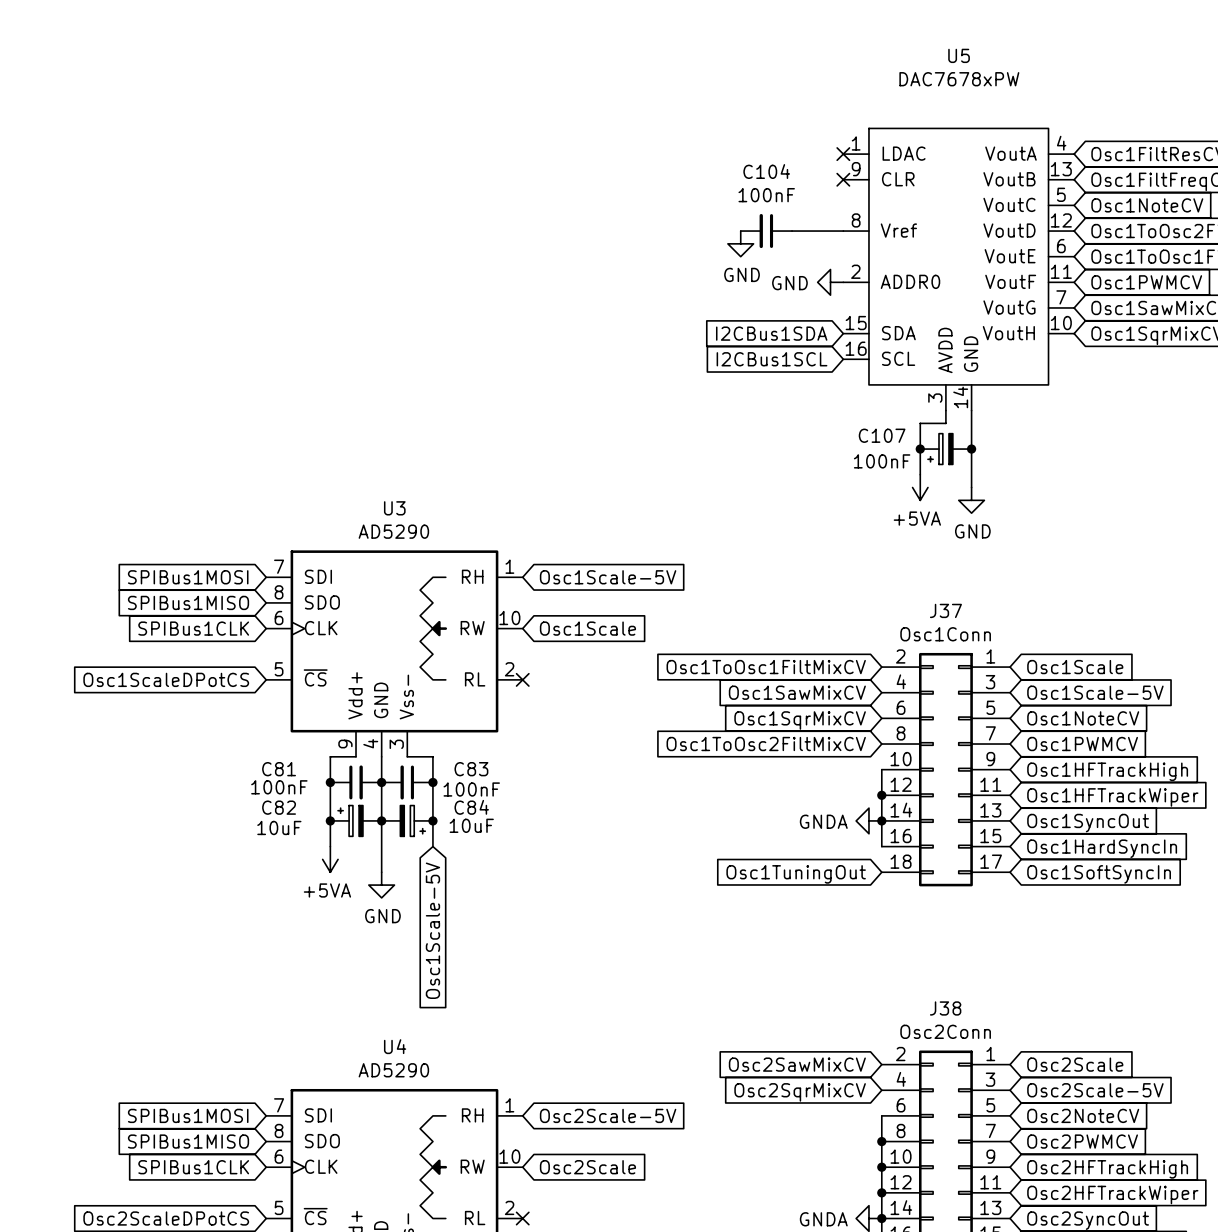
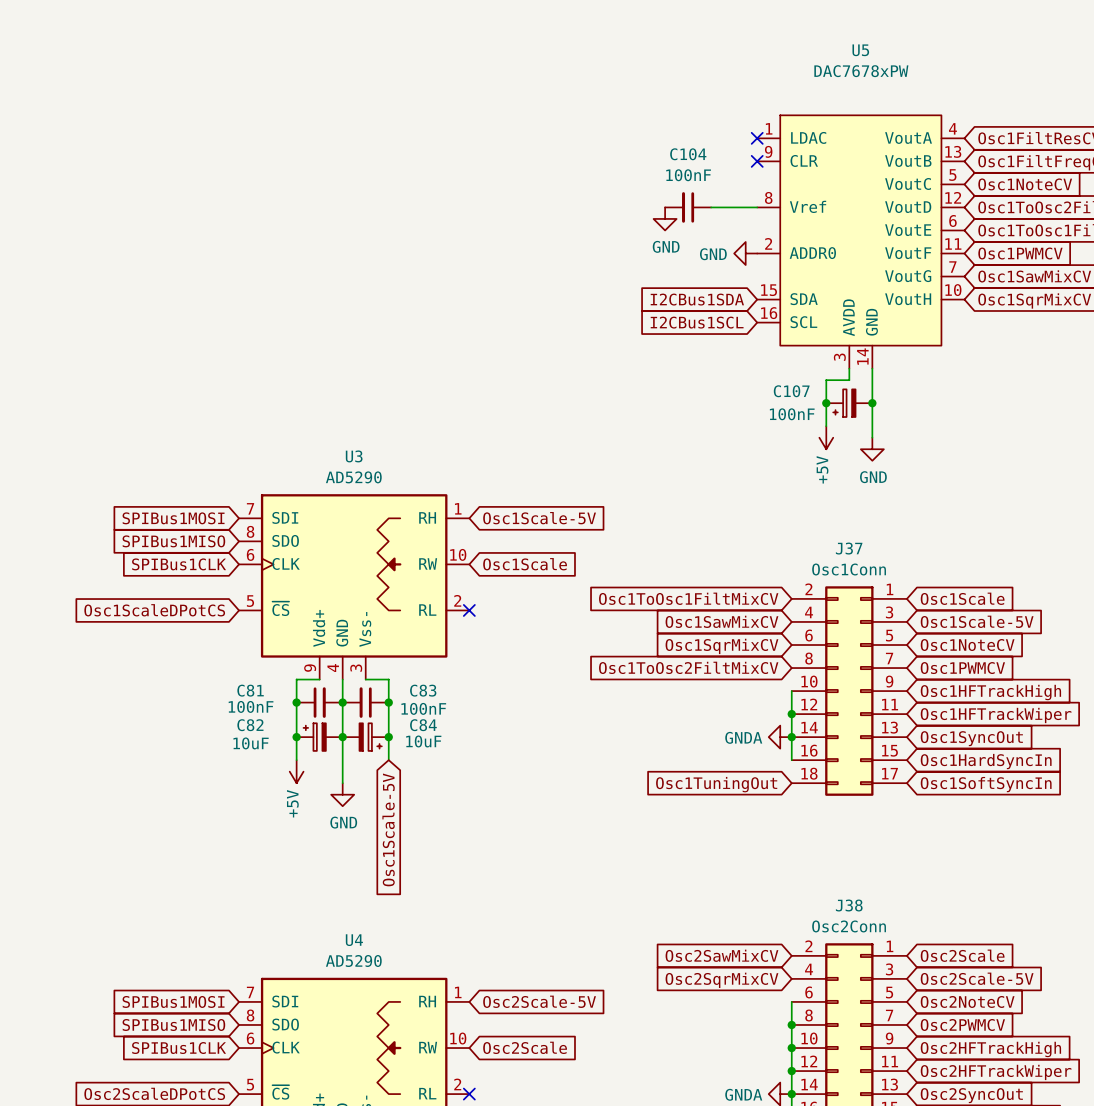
power symbol: +5VA (920, 487) -> +5V (826, 437)
power symbol: +5VA (330, 859) -> +5V (296, 771)

